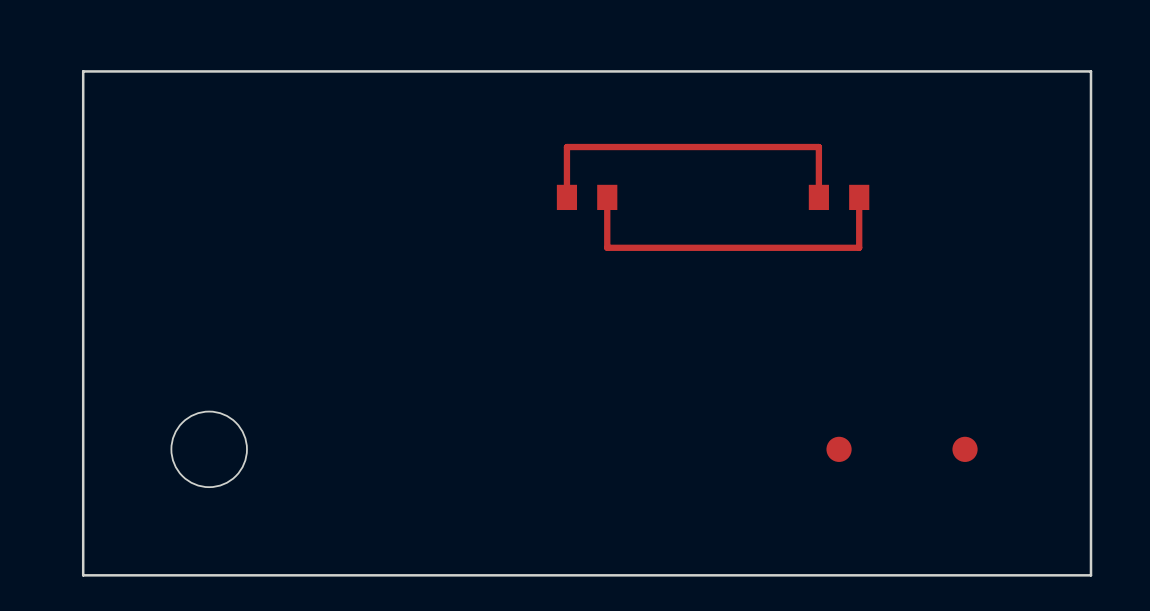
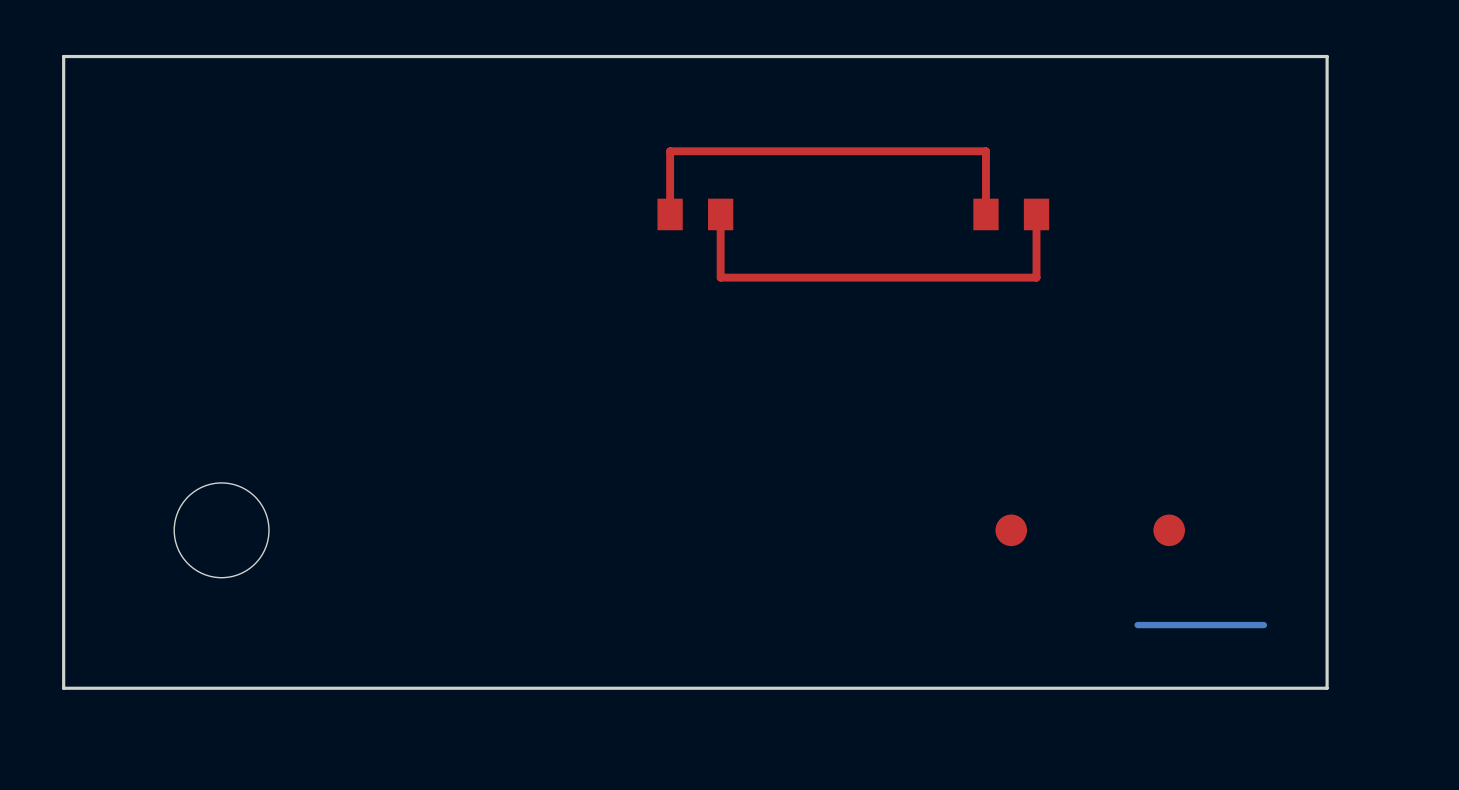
bottom track: none -> (1263, 625) (1137, 625)

